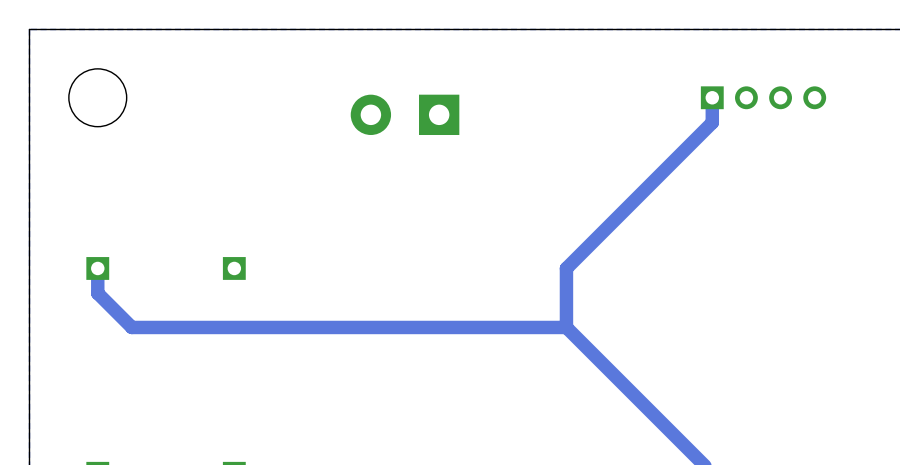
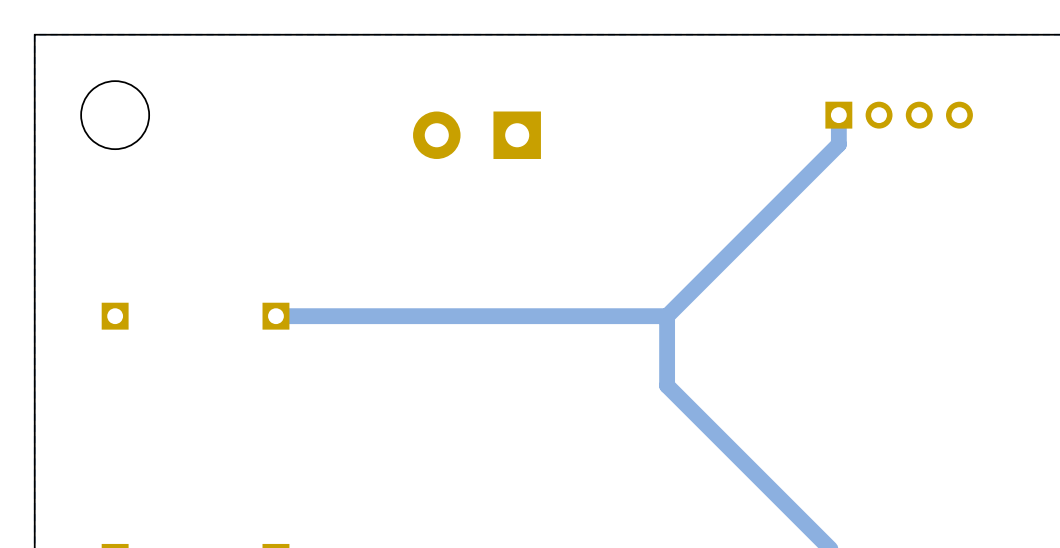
track: (97, 268) (97, 293) (131, 327) (566, 327) -> none
track: none -> (667, 316) (275, 316)

